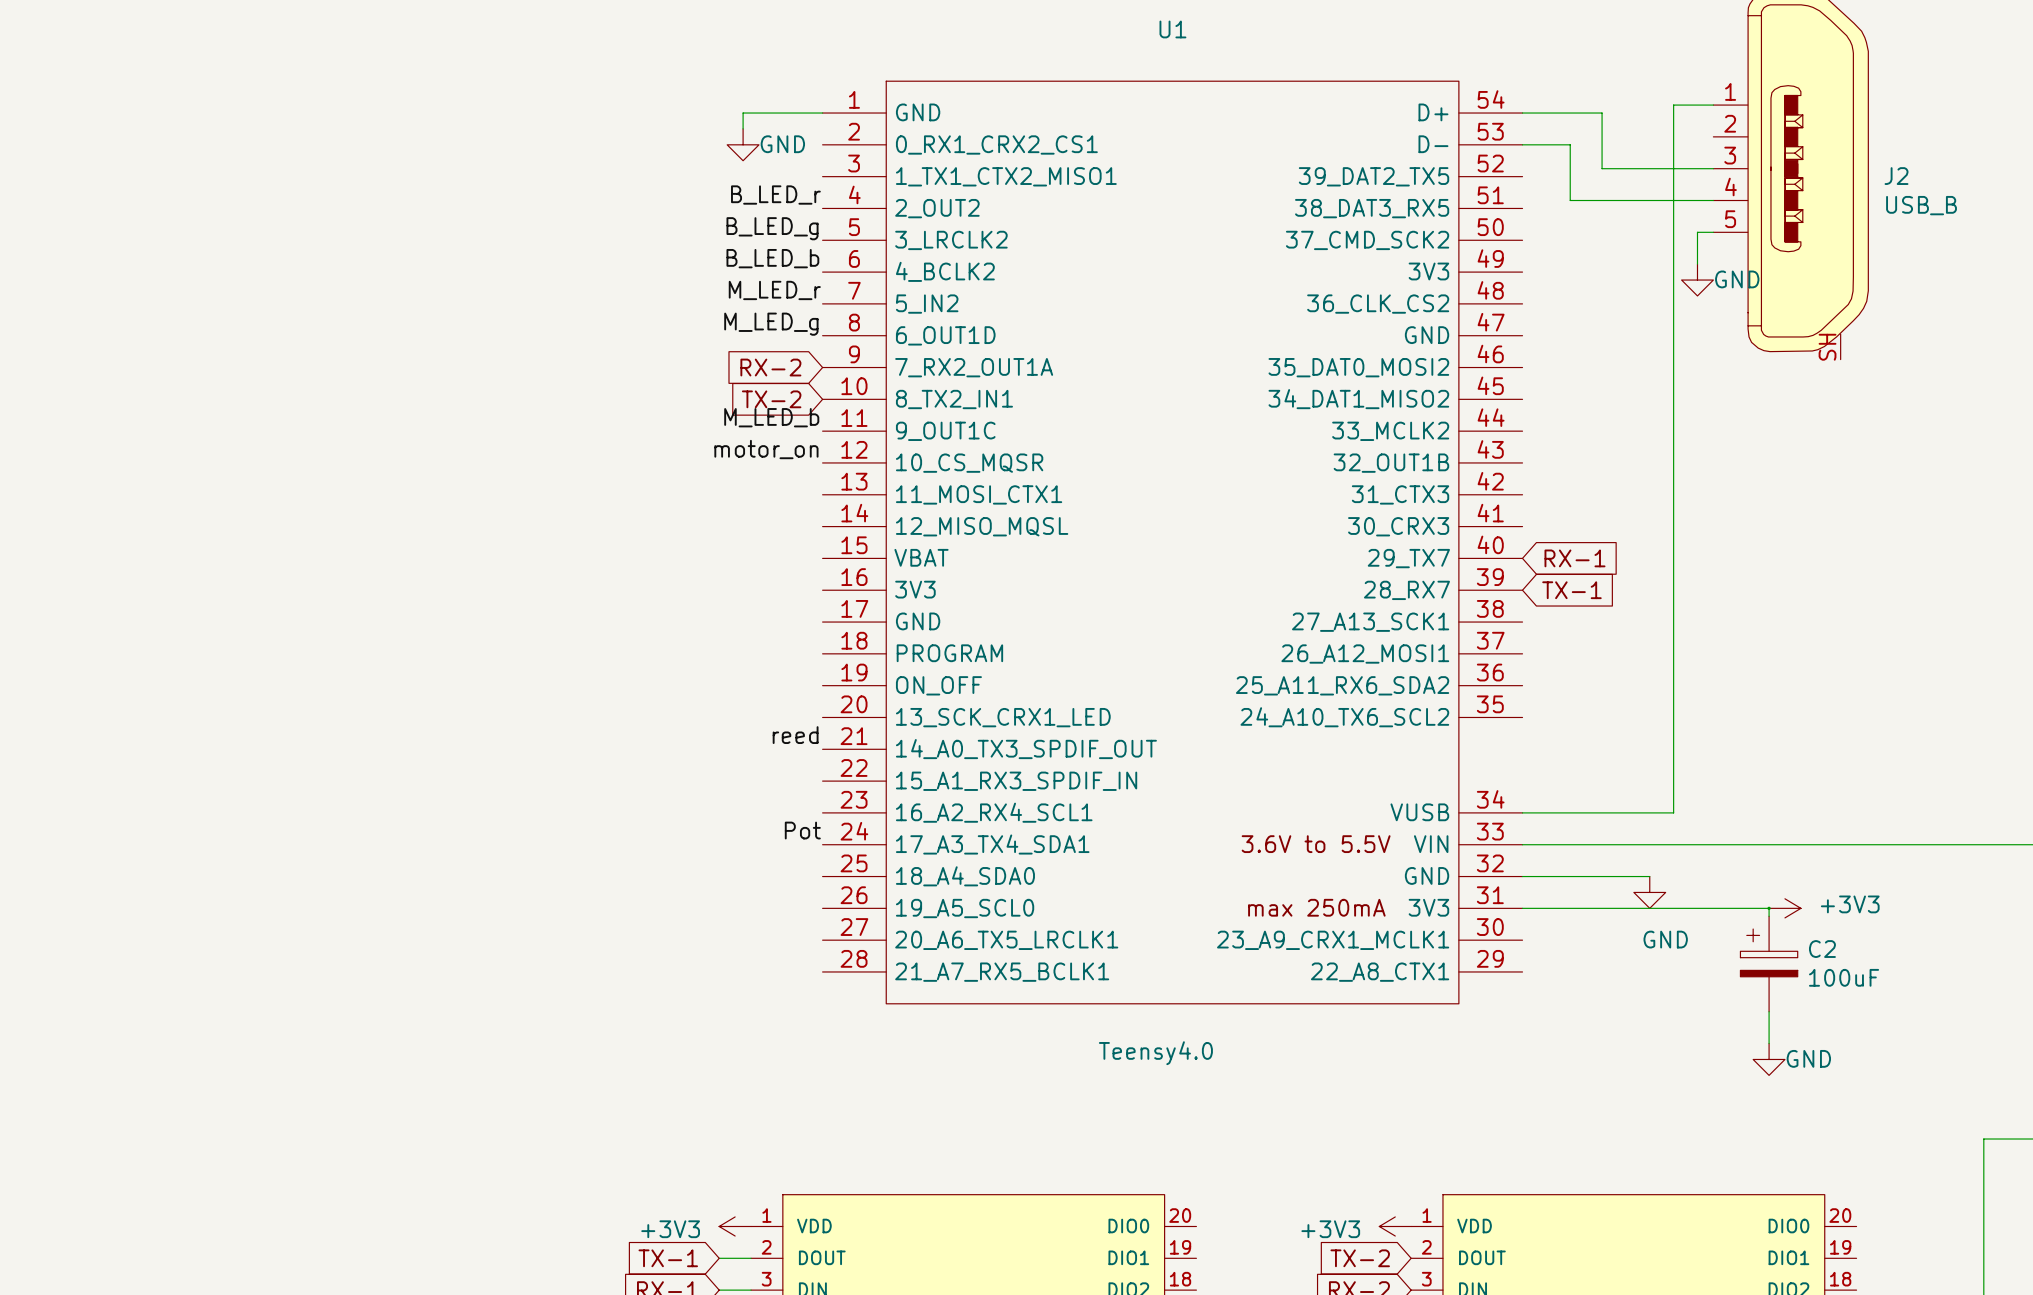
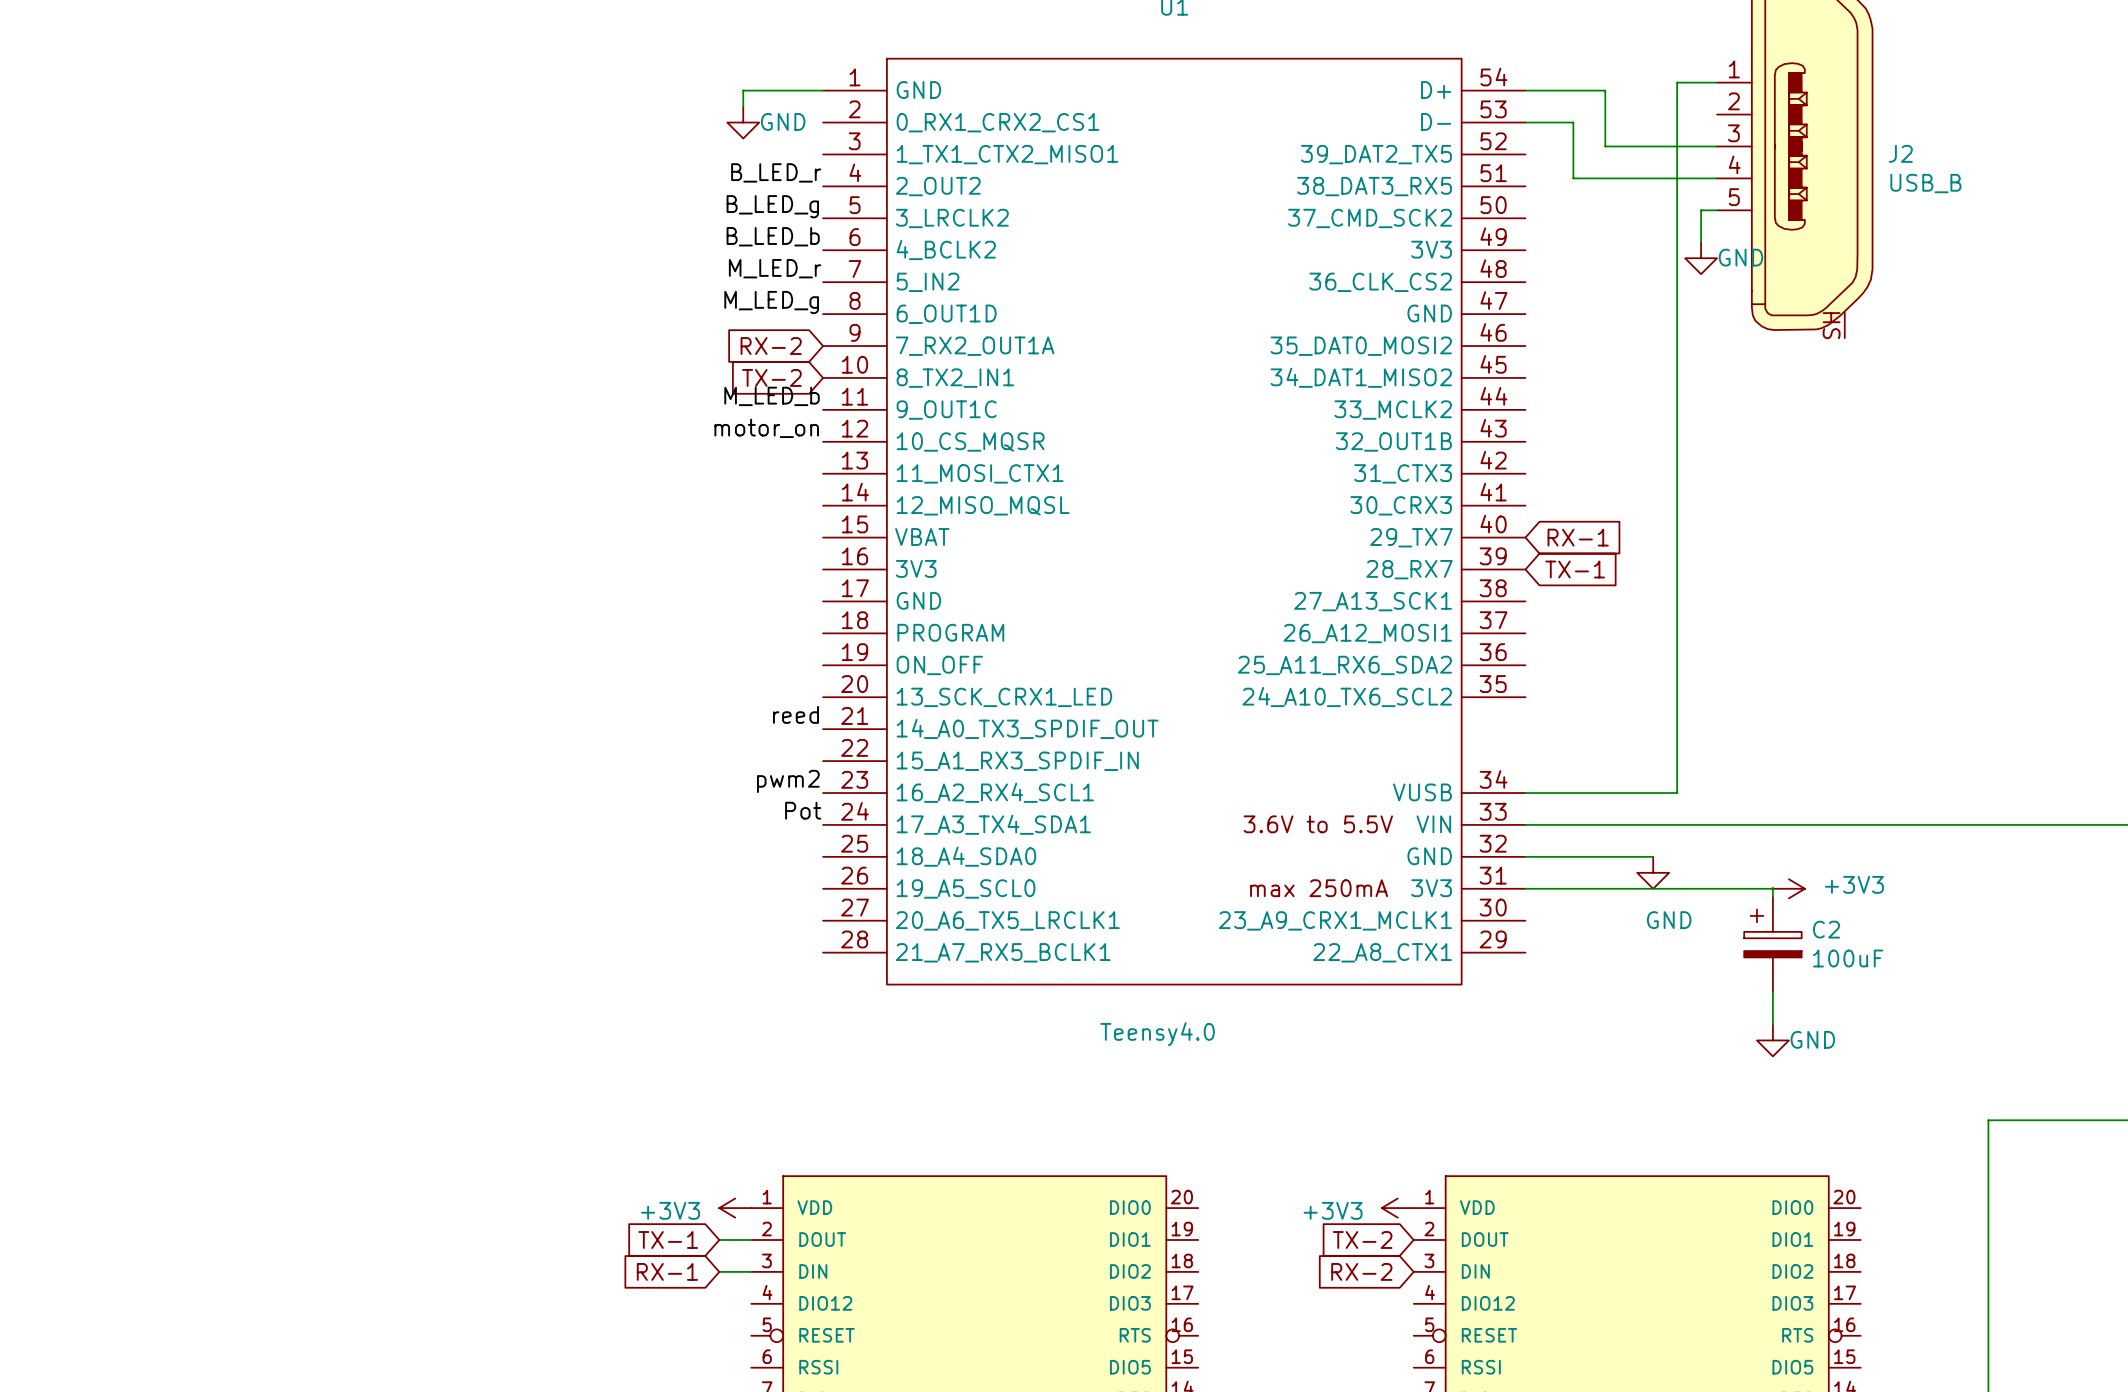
label: none -> pwm2 (788, 781)

